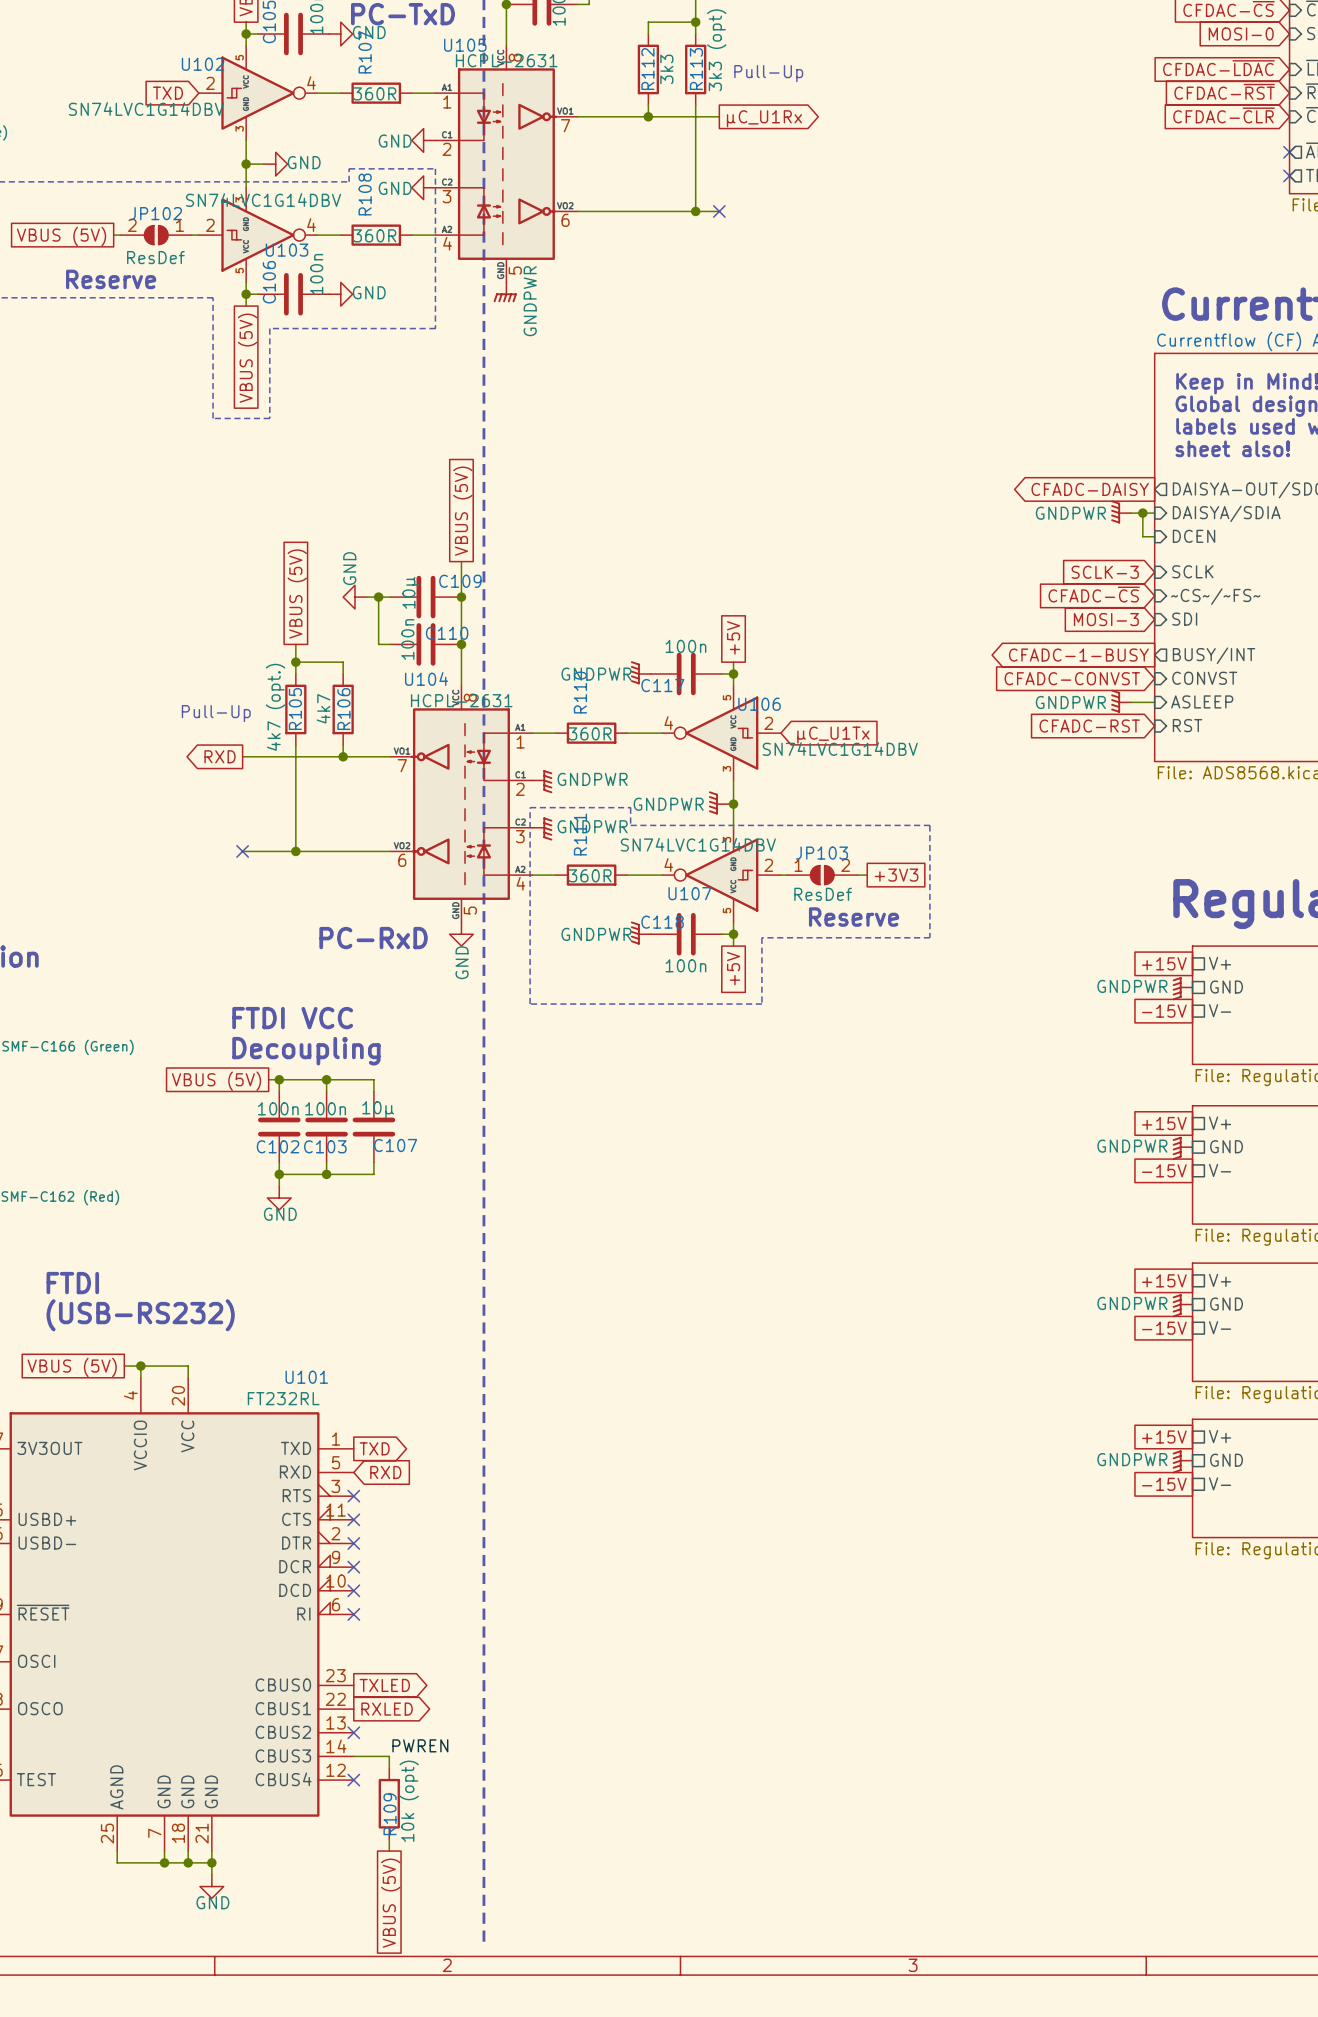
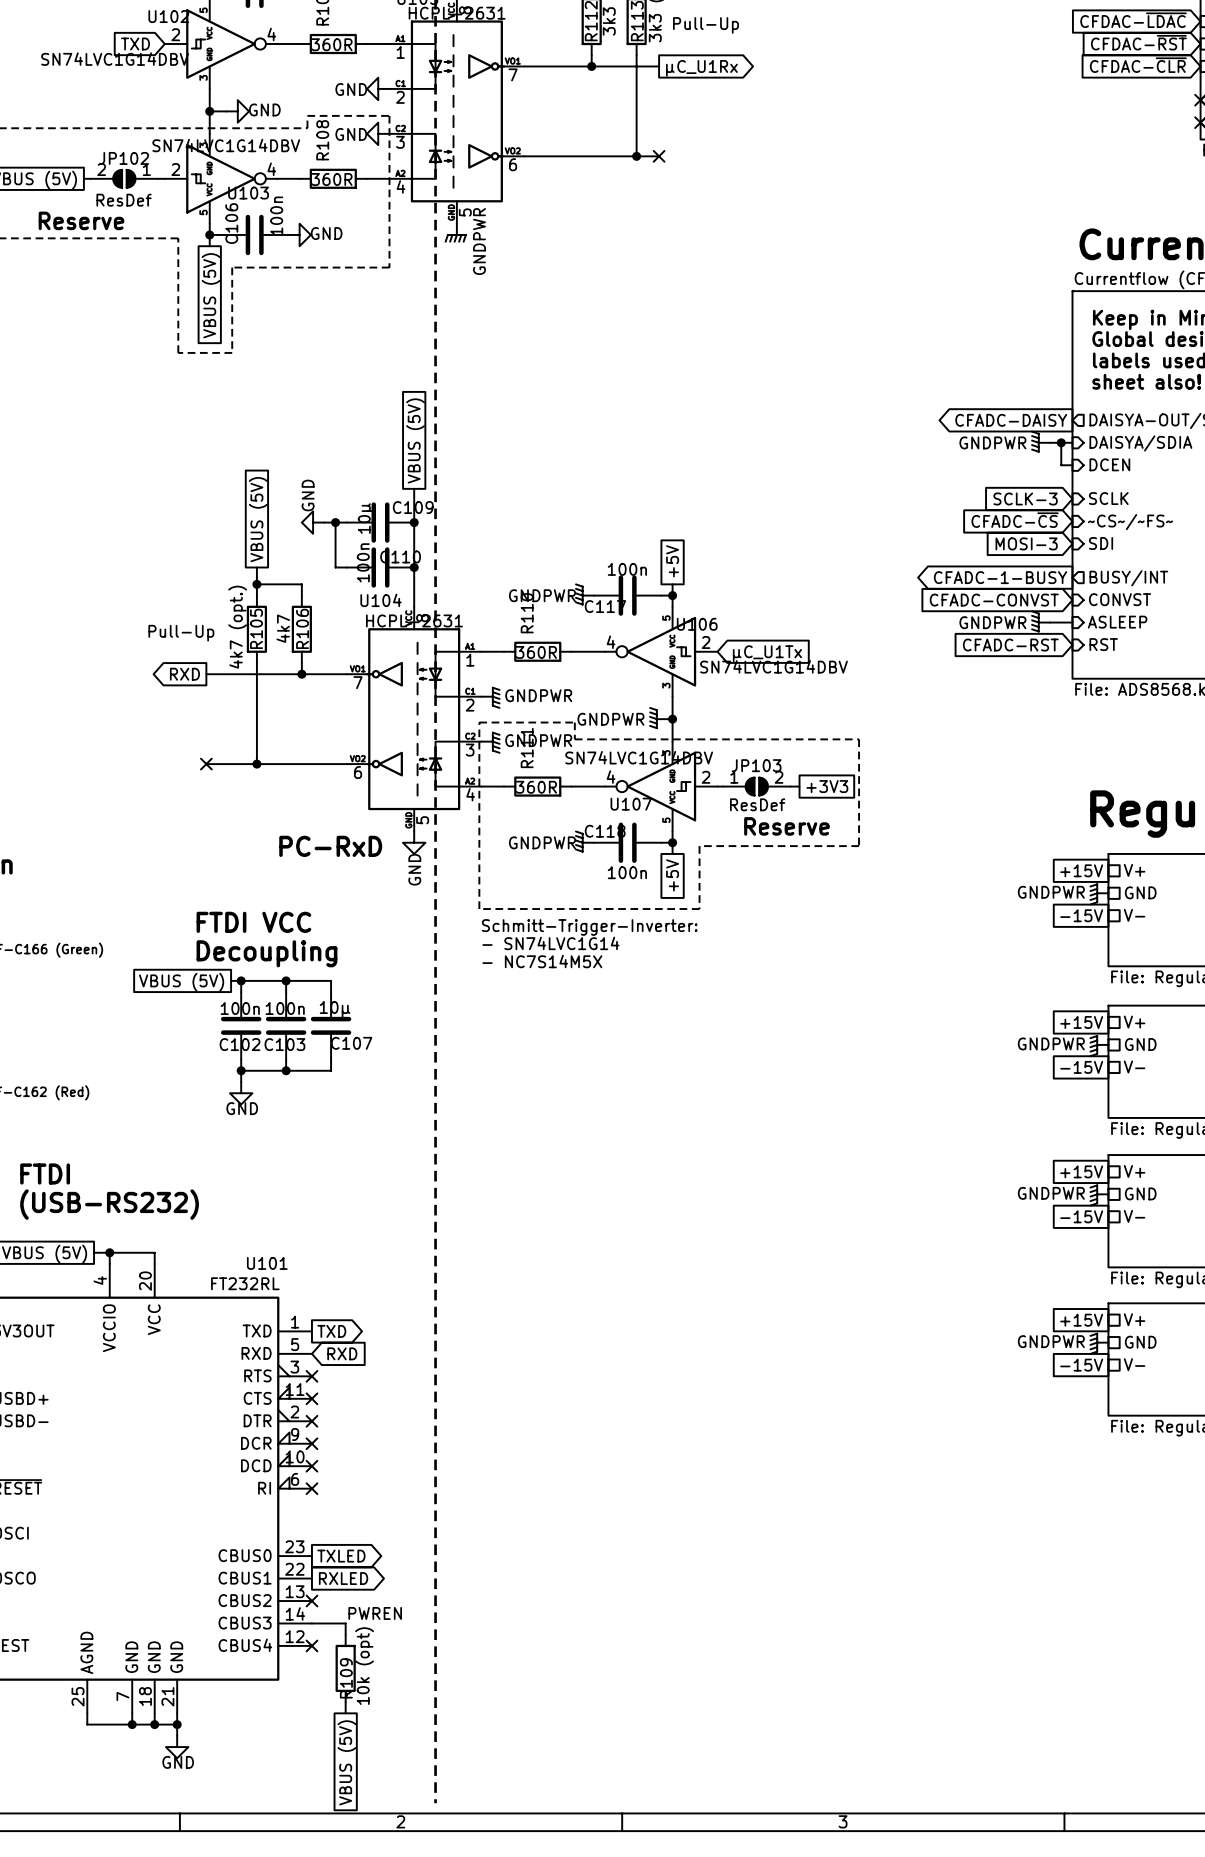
text: none -> Schmitt-Trigger-Inverter: (589, 927)
text: none -> - SN74LVC1G14 (550, 943)
text: none -> - NC7S14M5X (542, 961)

